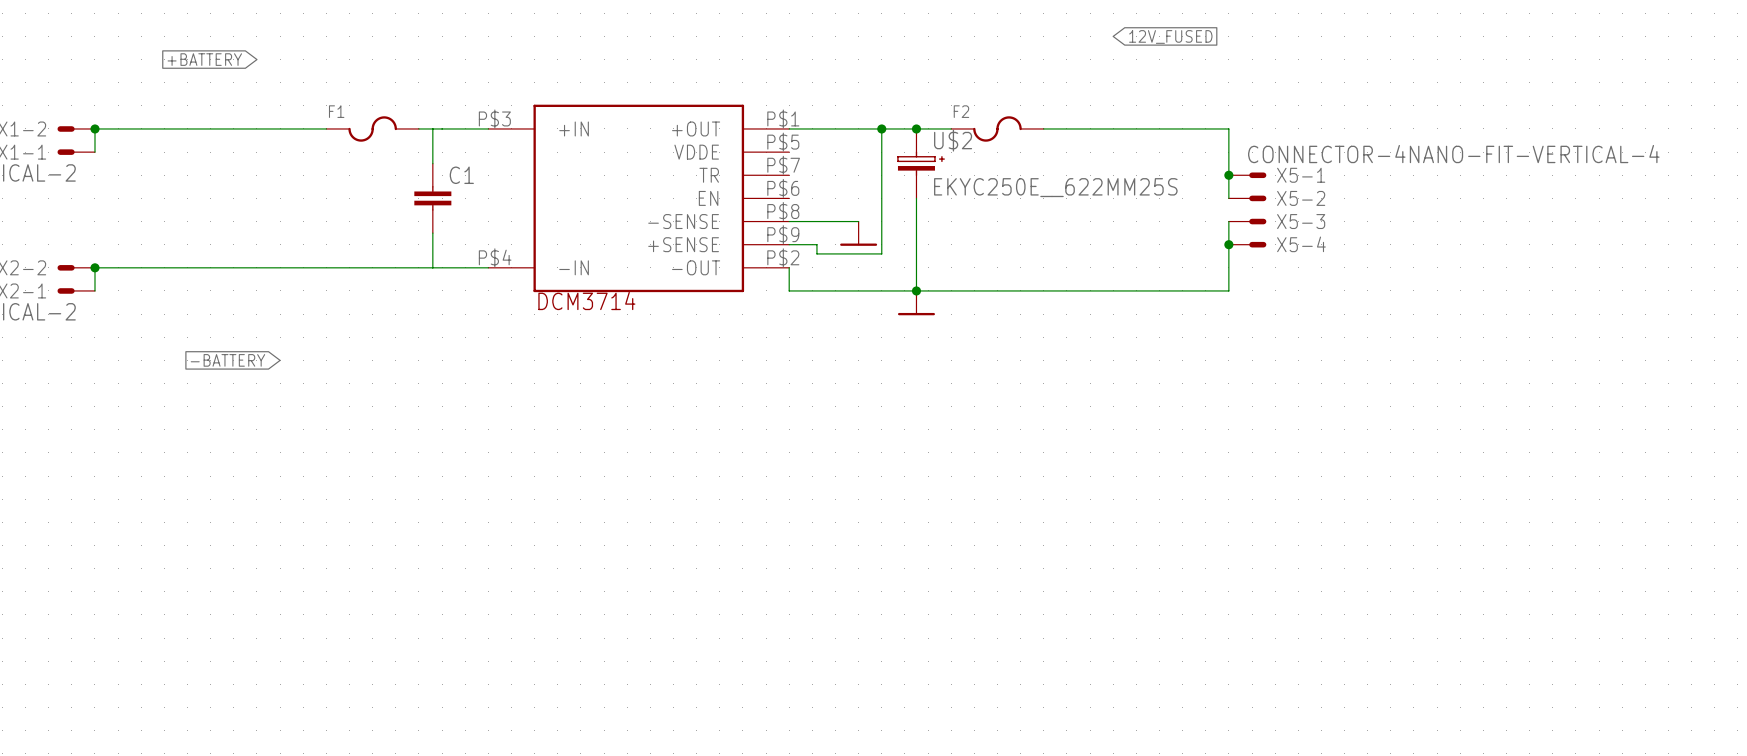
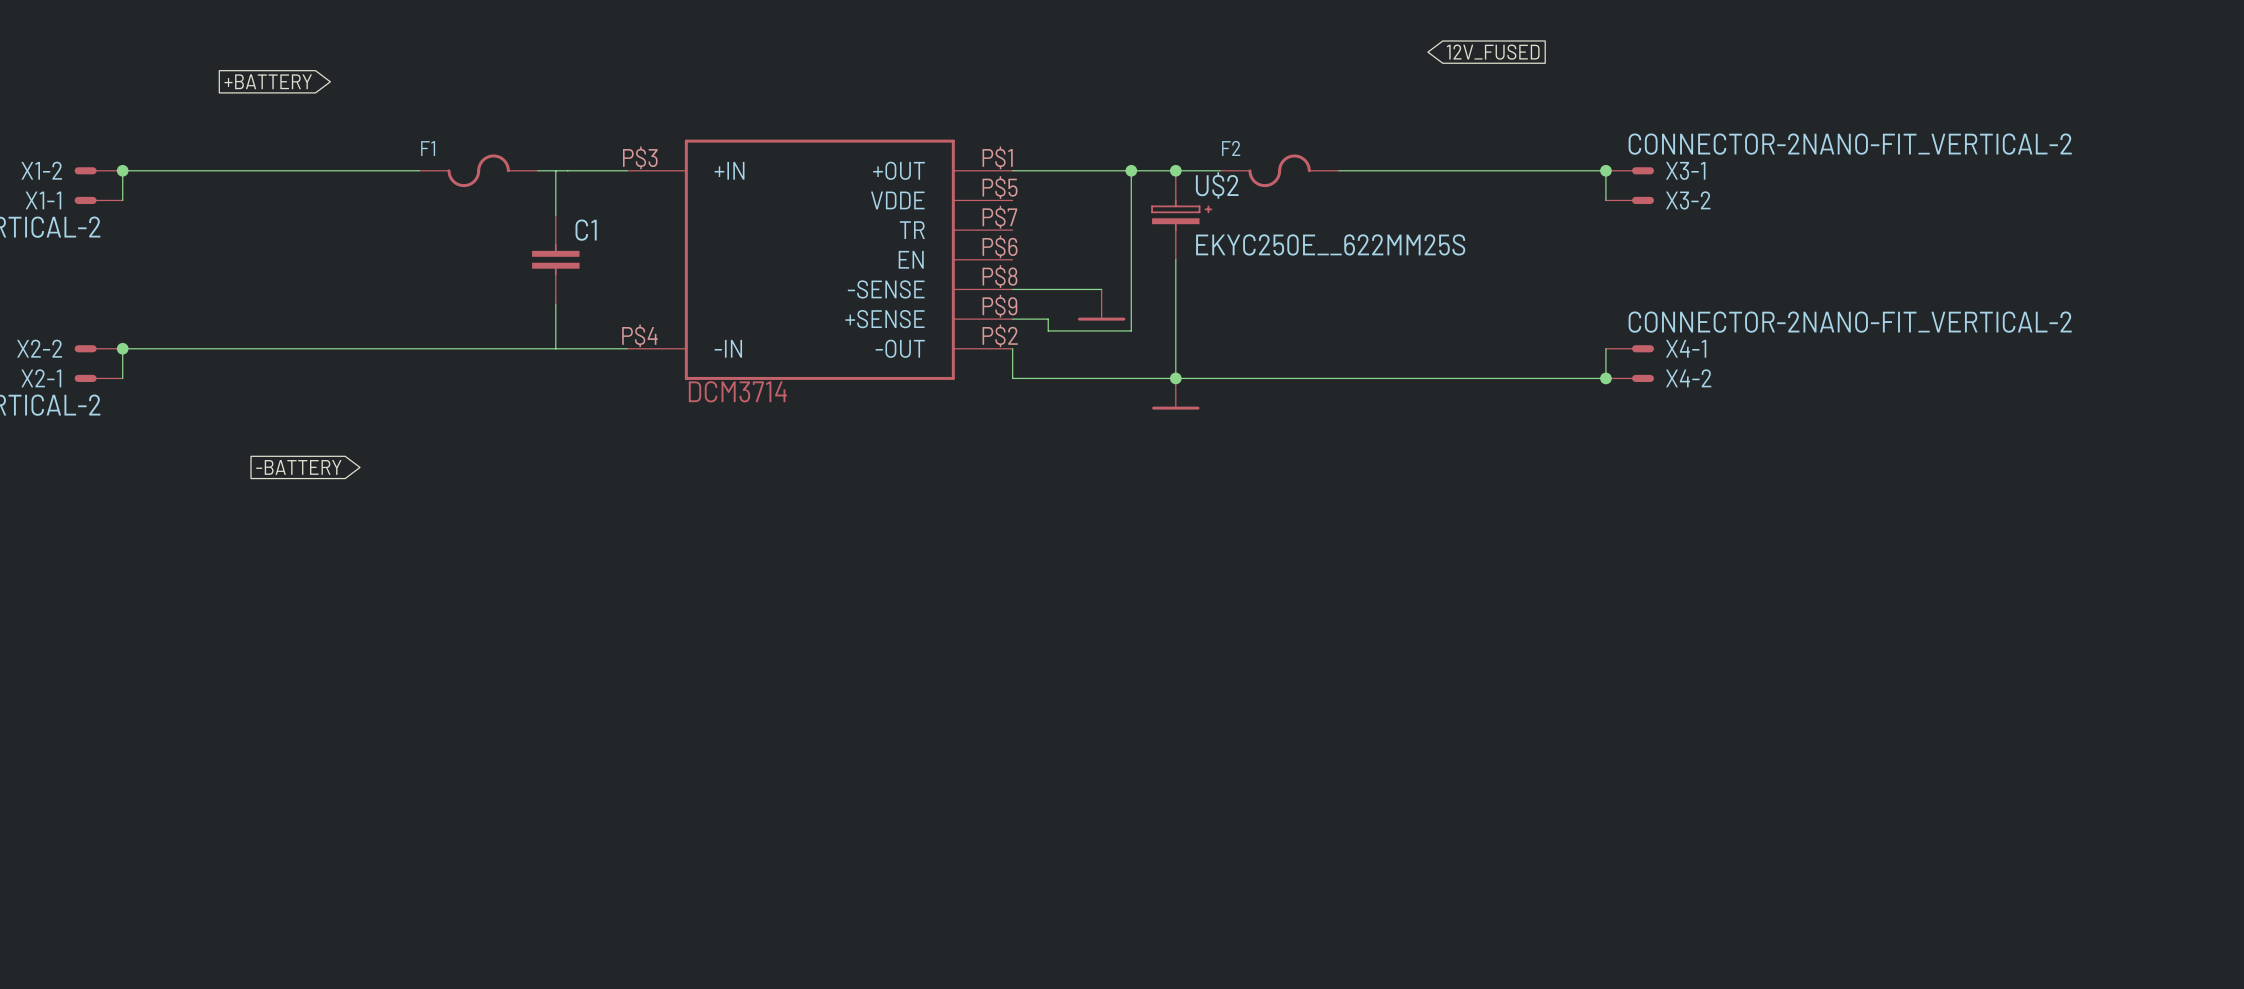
wire: (1228, 128) (1228, 198) -> (1576, 170) (1605, 170) (1605, 200)
X3-1: none -> CONNECTOR-2NANO-FIT_VERTICAL-2 (1629, 170)
X3-2: none -> (1629, 200)
junction position: (1228, 175) -> (1605, 170)
X5-1: CONNECTOR-4NANO-FIT-VERTICAL-4 (1247, 175) -> none
X5-2: (1247, 198) -> none
wire: (1228, 221) (1228, 290) -> (1605, 348) (1605, 378) (1576, 378)
X5-3: (1247, 221) -> none
junction position: (1228, 244) -> (1605, 378)
X5-4: (1247, 244) -> none
X4-1: none -> CONNECTOR-2NANO-FIT_VERTICAL-2 (1629, 348)
X4-2: none -> (1629, 378)

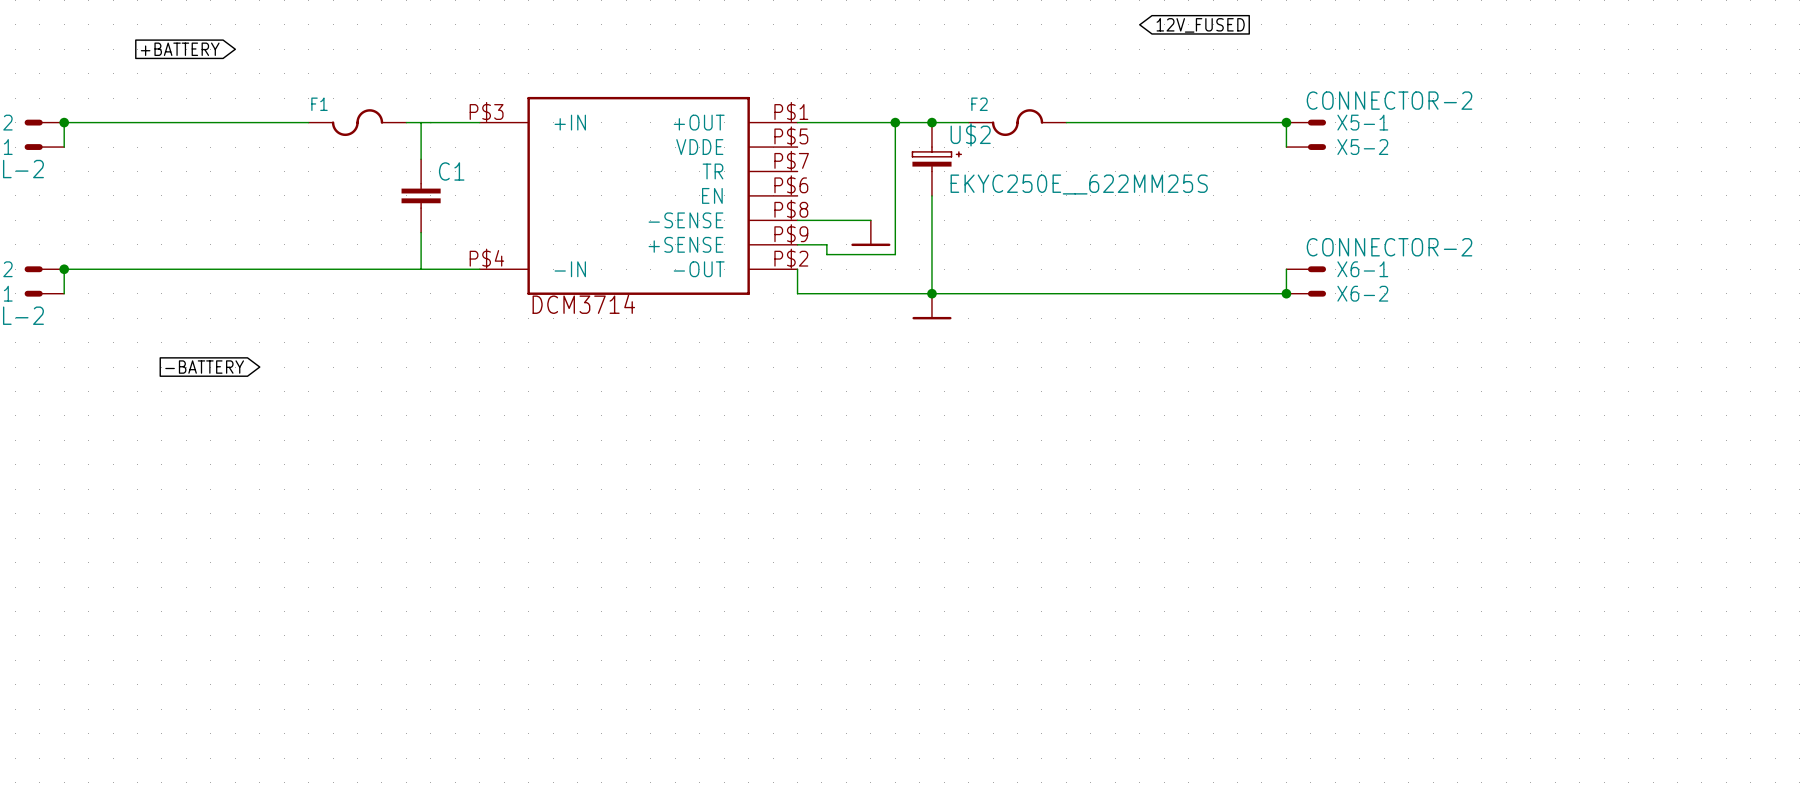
X3-1 value: CONNECTOR-2NANO-FIT_VERTICAL-2 (1850, 144) -> CONNECTOR-2 (1389, 100)
X3-1 name: X3-1 (1685, 170) -> X5-1 (1362, 122)
X3-2 name: X3-2 (1688, 200) -> X5-2 (1362, 147)
X4-1 value: CONNECTOR-2NANO-FIT_VERTICAL-2 (1850, 322) -> CONNECTOR-2 (1389, 247)
X4-1 name: X4-1 (1686, 348) -> X6-1 (1362, 269)
X4-2 name: X4-2 (1688, 378) -> X6-2 (1362, 293)

